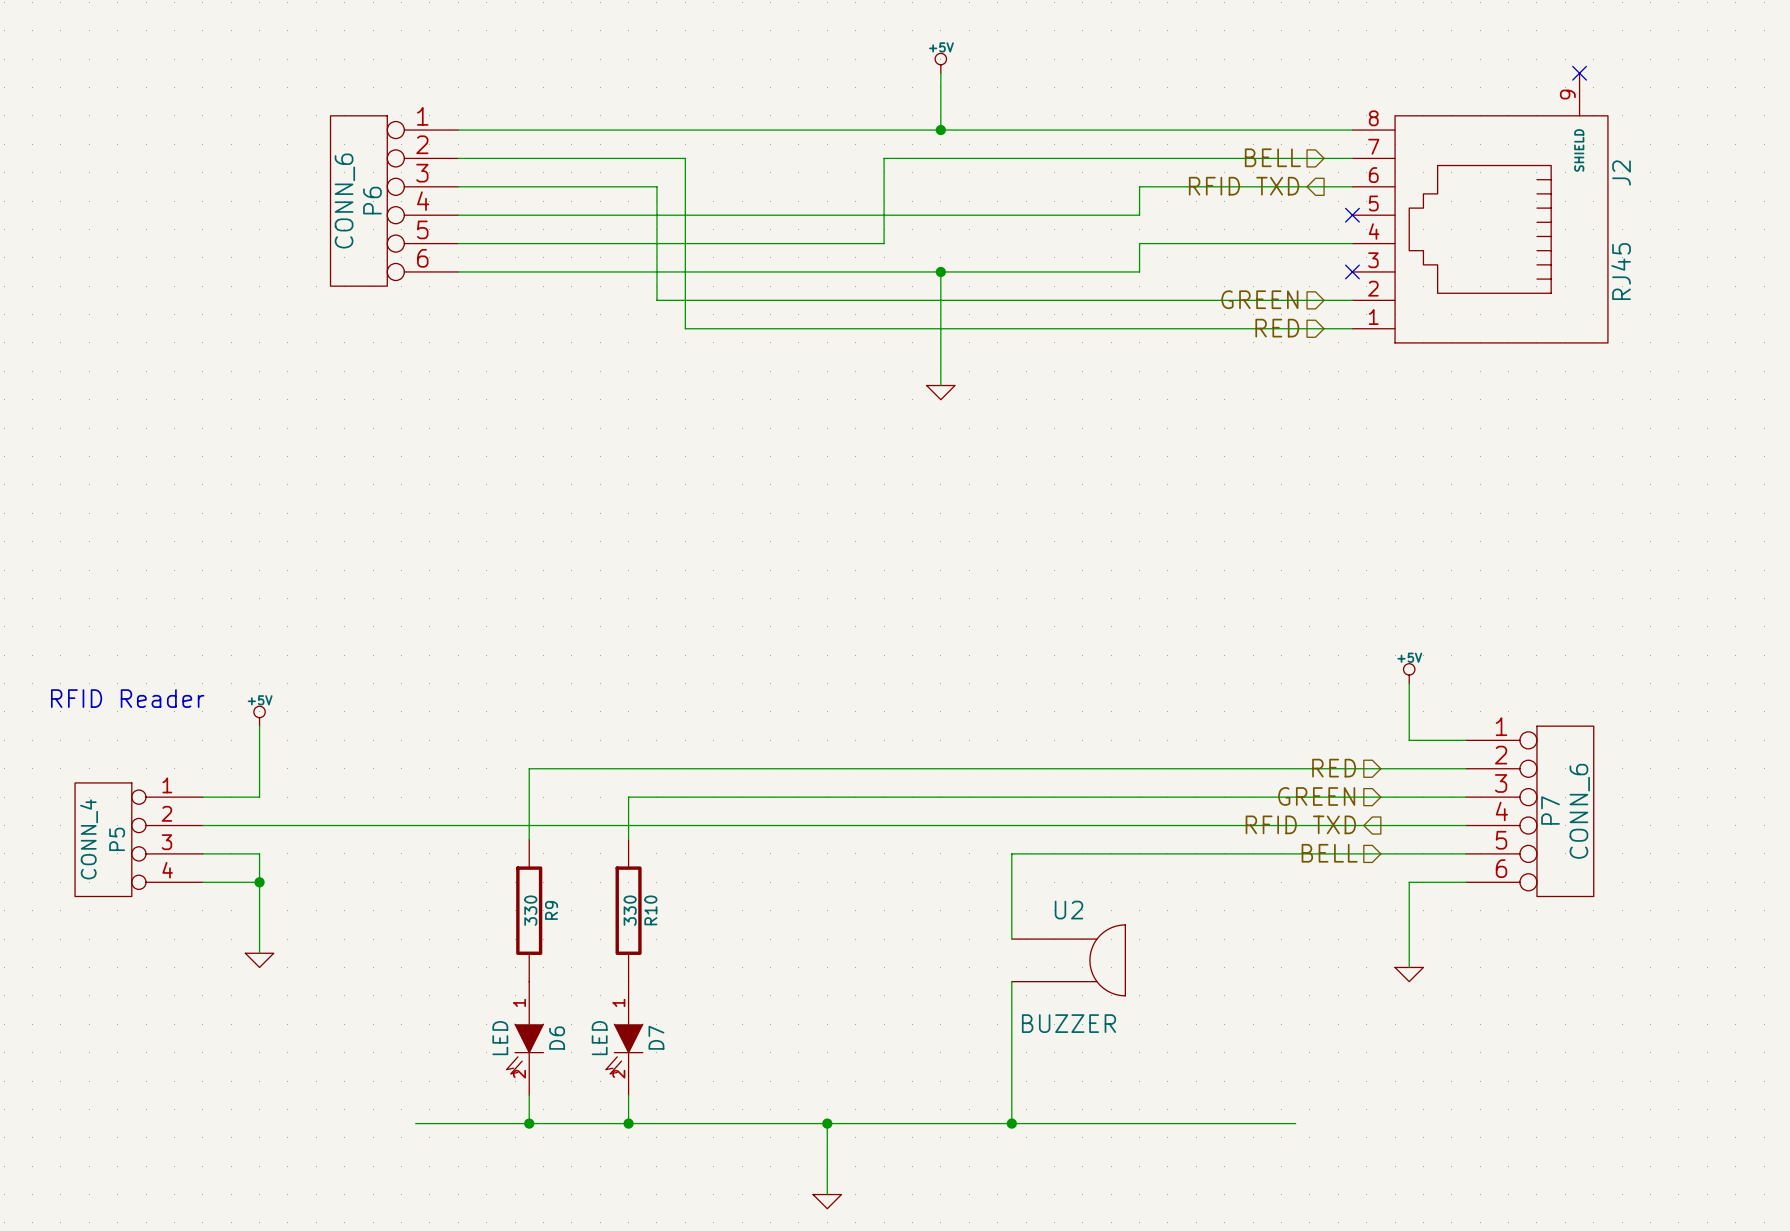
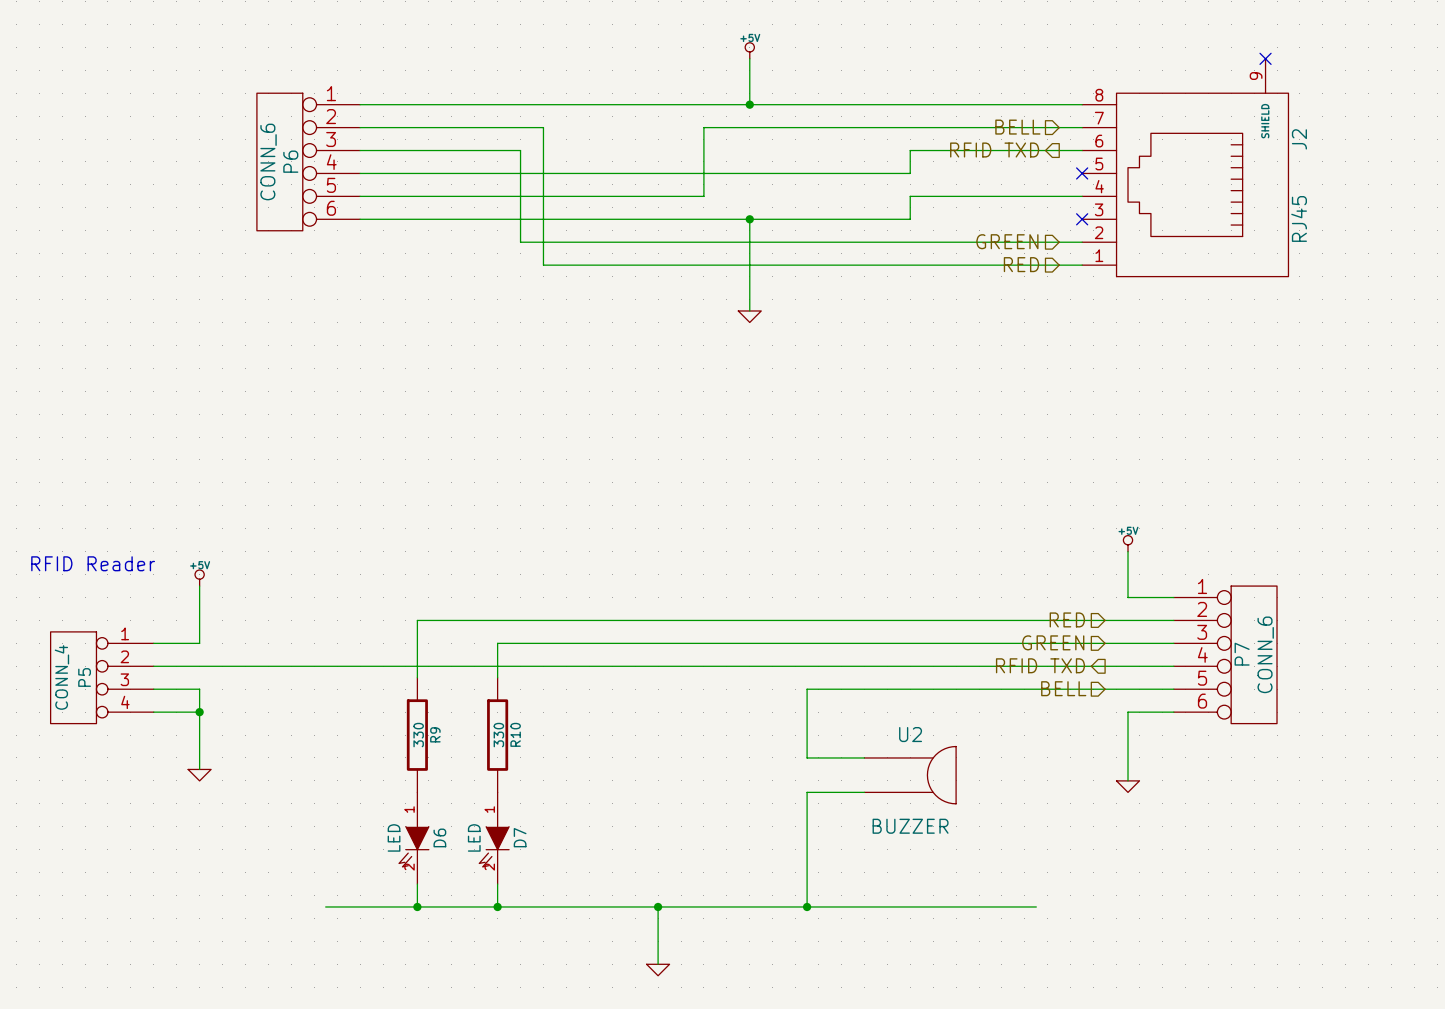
U2 position: (1068, 960) -> (910, 775)

